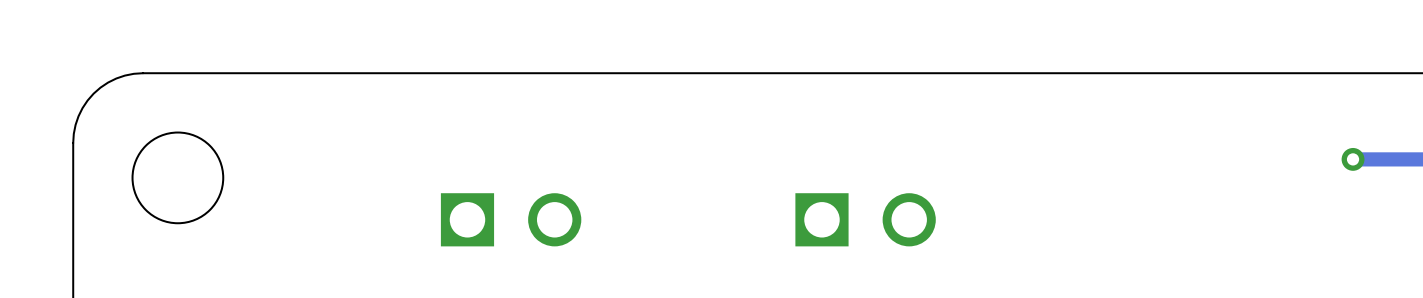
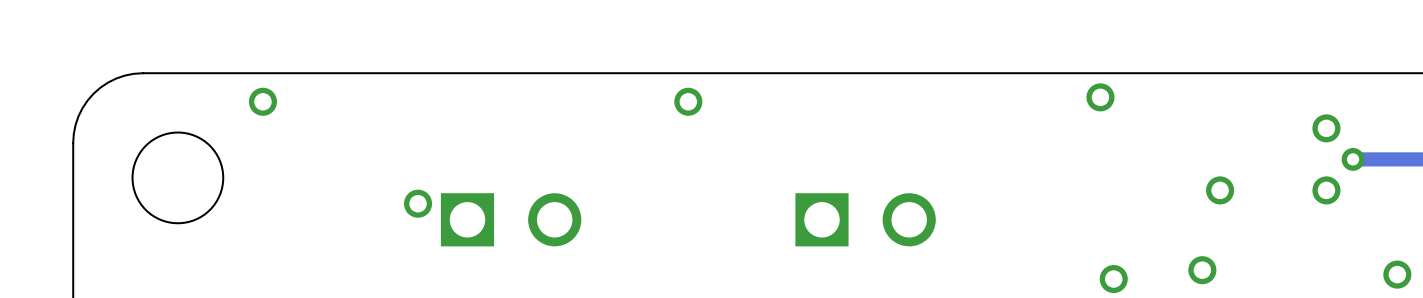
via: none -> (1100, 97)
via: none -> (262, 101)
via: none -> (688, 101)
via: none -> (1326, 128)
via: none -> (1220, 190)
via: none -> (1326, 190)
via: none -> (418, 203)
via: none -> (1202, 270)
via: none -> (1397, 274)
via: none -> (1113, 279)

